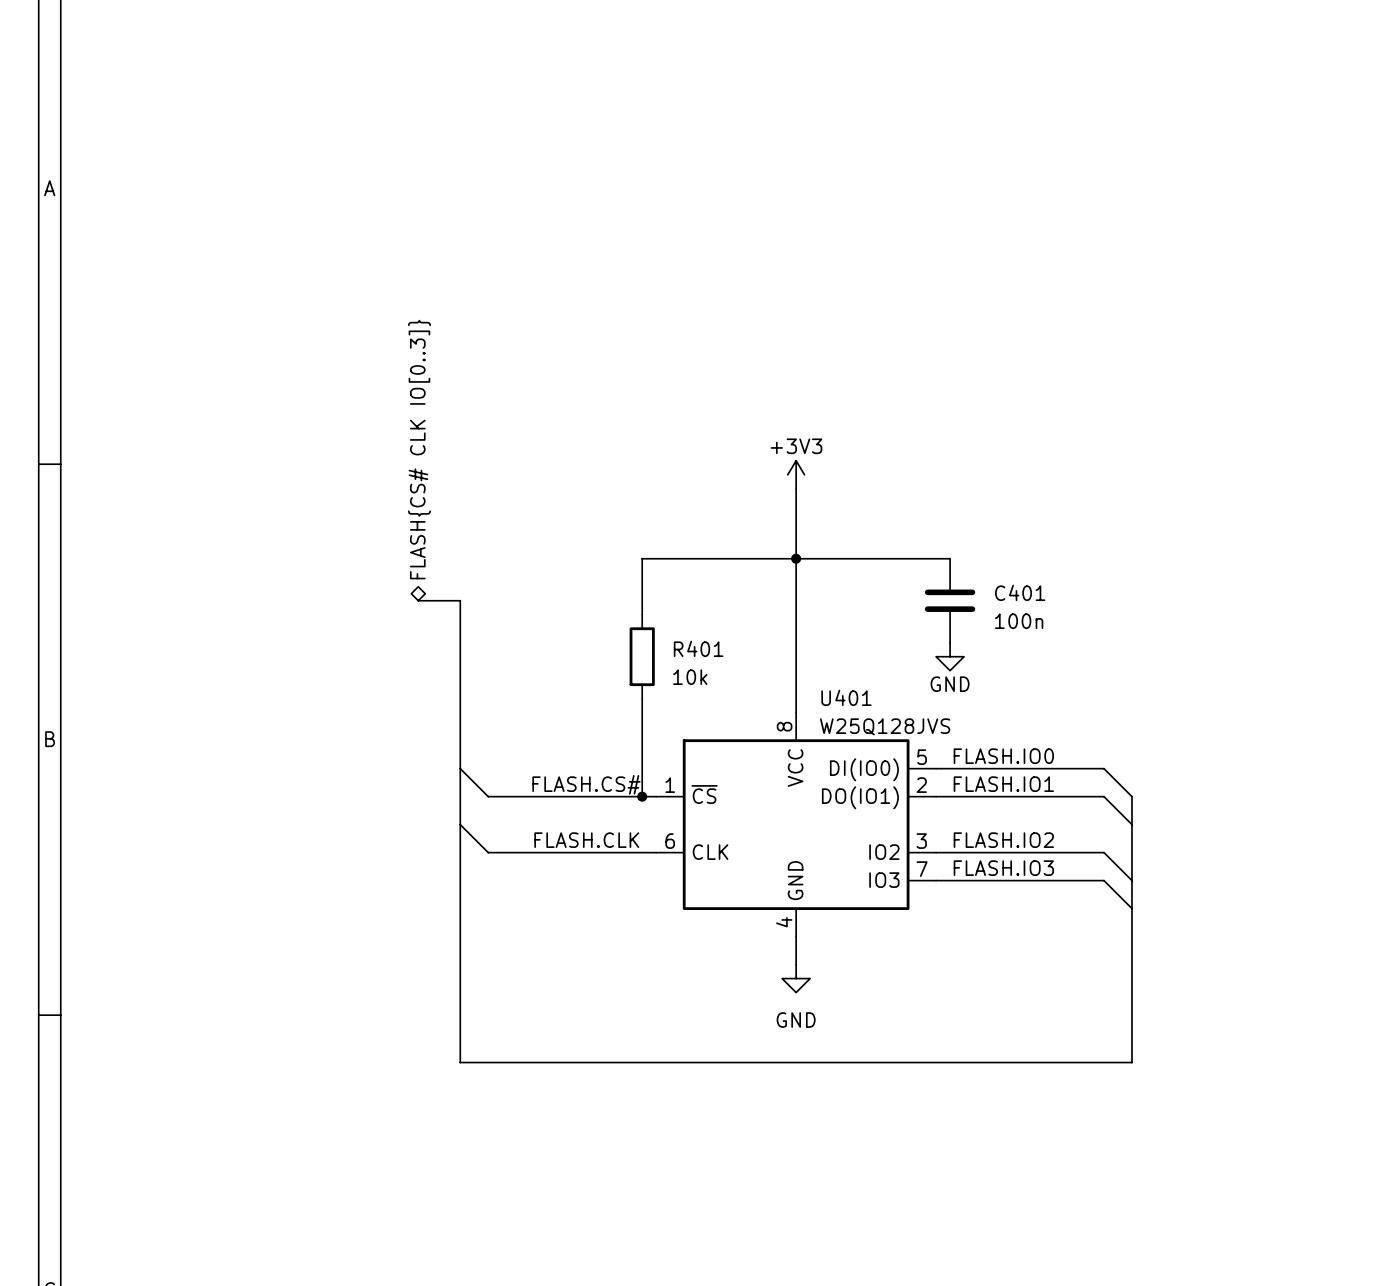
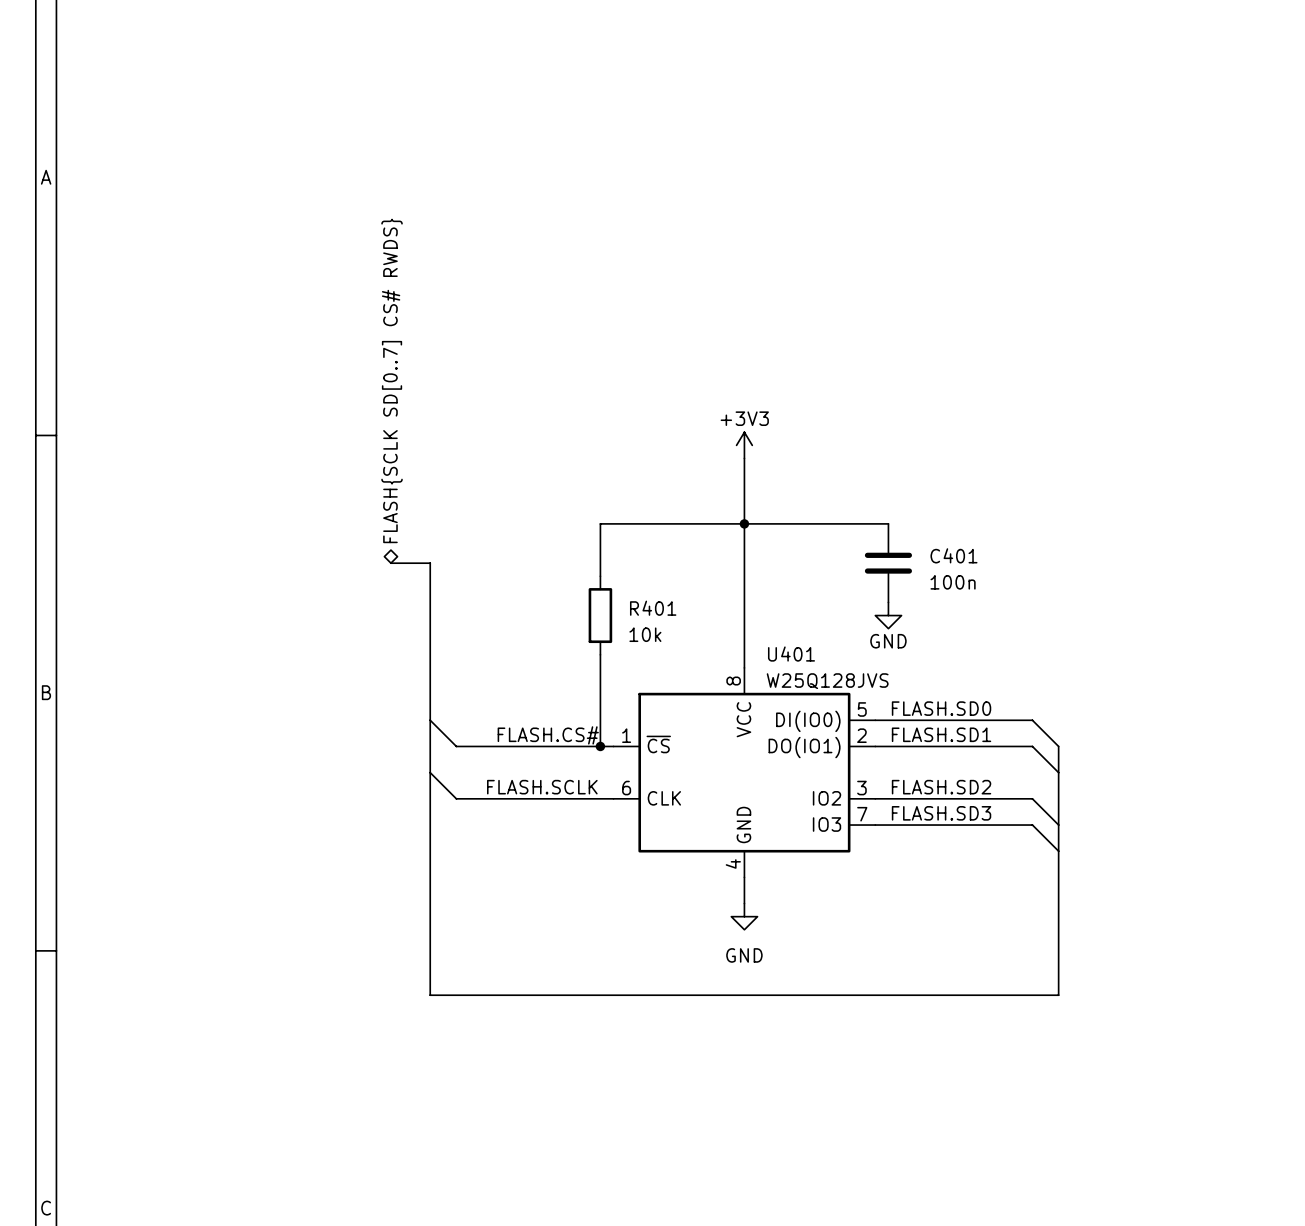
hierarchical label: FLASH{CS# CLK IO[0..3]} (419, 449) -> FLASH{SCLK SD[0..7] CS# RWDS} (392, 380)
label: FLASH.IO0 (1003, 756) -> FLASH.SD0 (941, 708)
label: FLASH.IO1 (1003, 784) -> FLASH.SD1 (941, 734)
label: FLASH.CLK (586, 840) -> FLASH.SCLK (542, 787)
label: FLASH.IO2 (1003, 840) -> FLASH.SD2 (941, 787)
label: FLASH.IO3 (1003, 868) -> FLASH.SD3 (941, 813)

